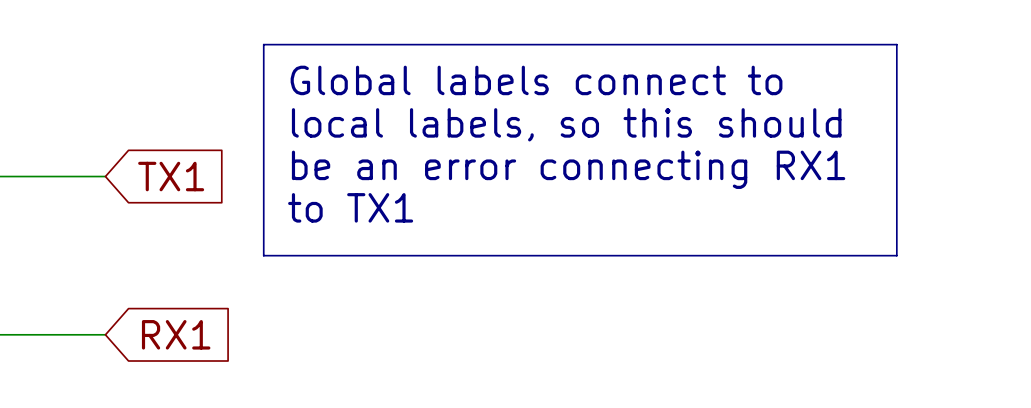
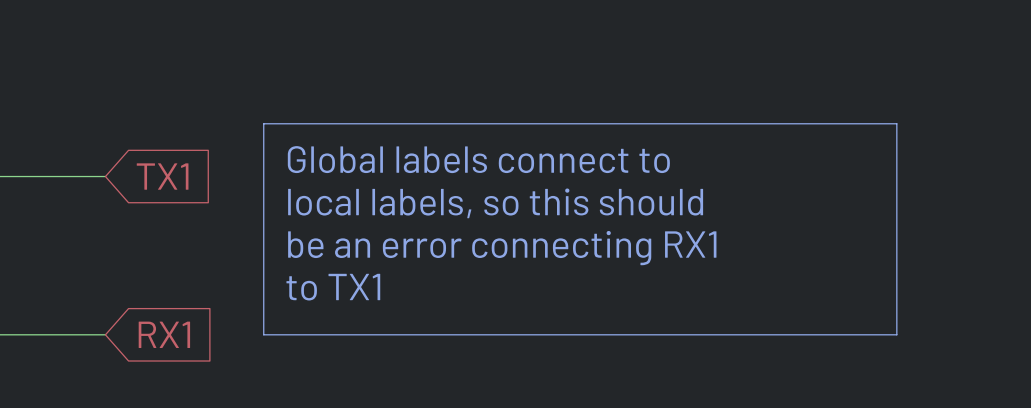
text position: Global labels connect to (536, 80) -> Global labels connect to (478, 159)
line: (263, 123) (263, 44) (896, 44) (896, 123) -> (263, 123) (896, 123)
text position: local labels, so this should (566, 124) -> local labels, so this should (495, 203)
text position: be an error connecting RX1 (568, 169) -> be an error connecting RX1 (502, 248)
text position: to TX1 (350, 207) -> to TX1 (333, 287)
line: (263, 255) (896, 255) -> (263, 255) (263, 334) (896, 334) (896, 255)

